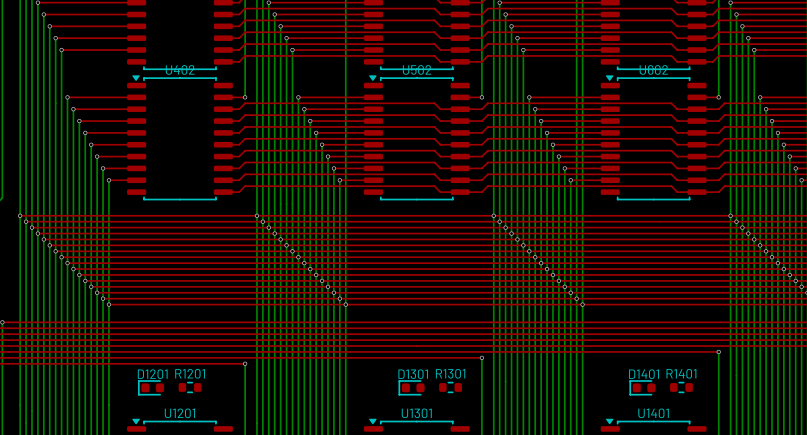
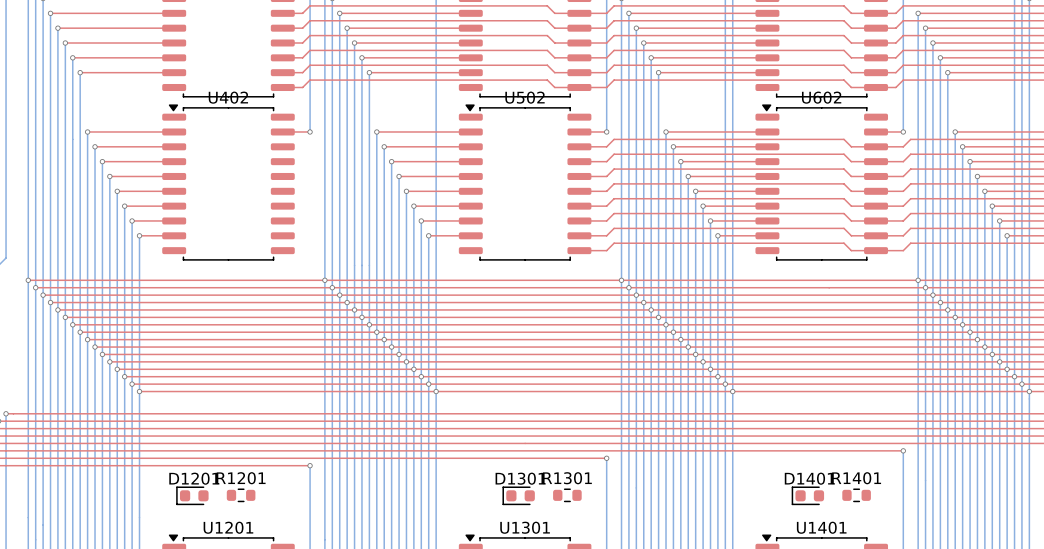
top track: (223, 109) (239, 109) (245, 103) (434, 103) (440, 109) (460, 109) -> none
top track: (223, 121) (239, 121) (245, 115) (434, 115) (440, 121) (460, 121) -> none
top track: (223, 132) (239, 132) (245, 126) (434, 126) (440, 132) (460, 132) -> none
top track: (223, 144) (239, 144) (245, 138) (434, 138) (440, 144) (460, 144) -> none
top track: (223, 156) (239, 156) (245, 150) (434, 150) (440, 156) (460, 156) -> none
top track: (223, 168) (239, 168) (245, 162) (434, 162) (440, 168) (460, 168) -> none
top track: (223, 180) (239, 180) (245, 174) (434, 174) (440, 180) (460, 180) -> none
top track: (223, 192) (239, 192) (245, 186) (434, 186) (440, 192) (460, 192) -> none

